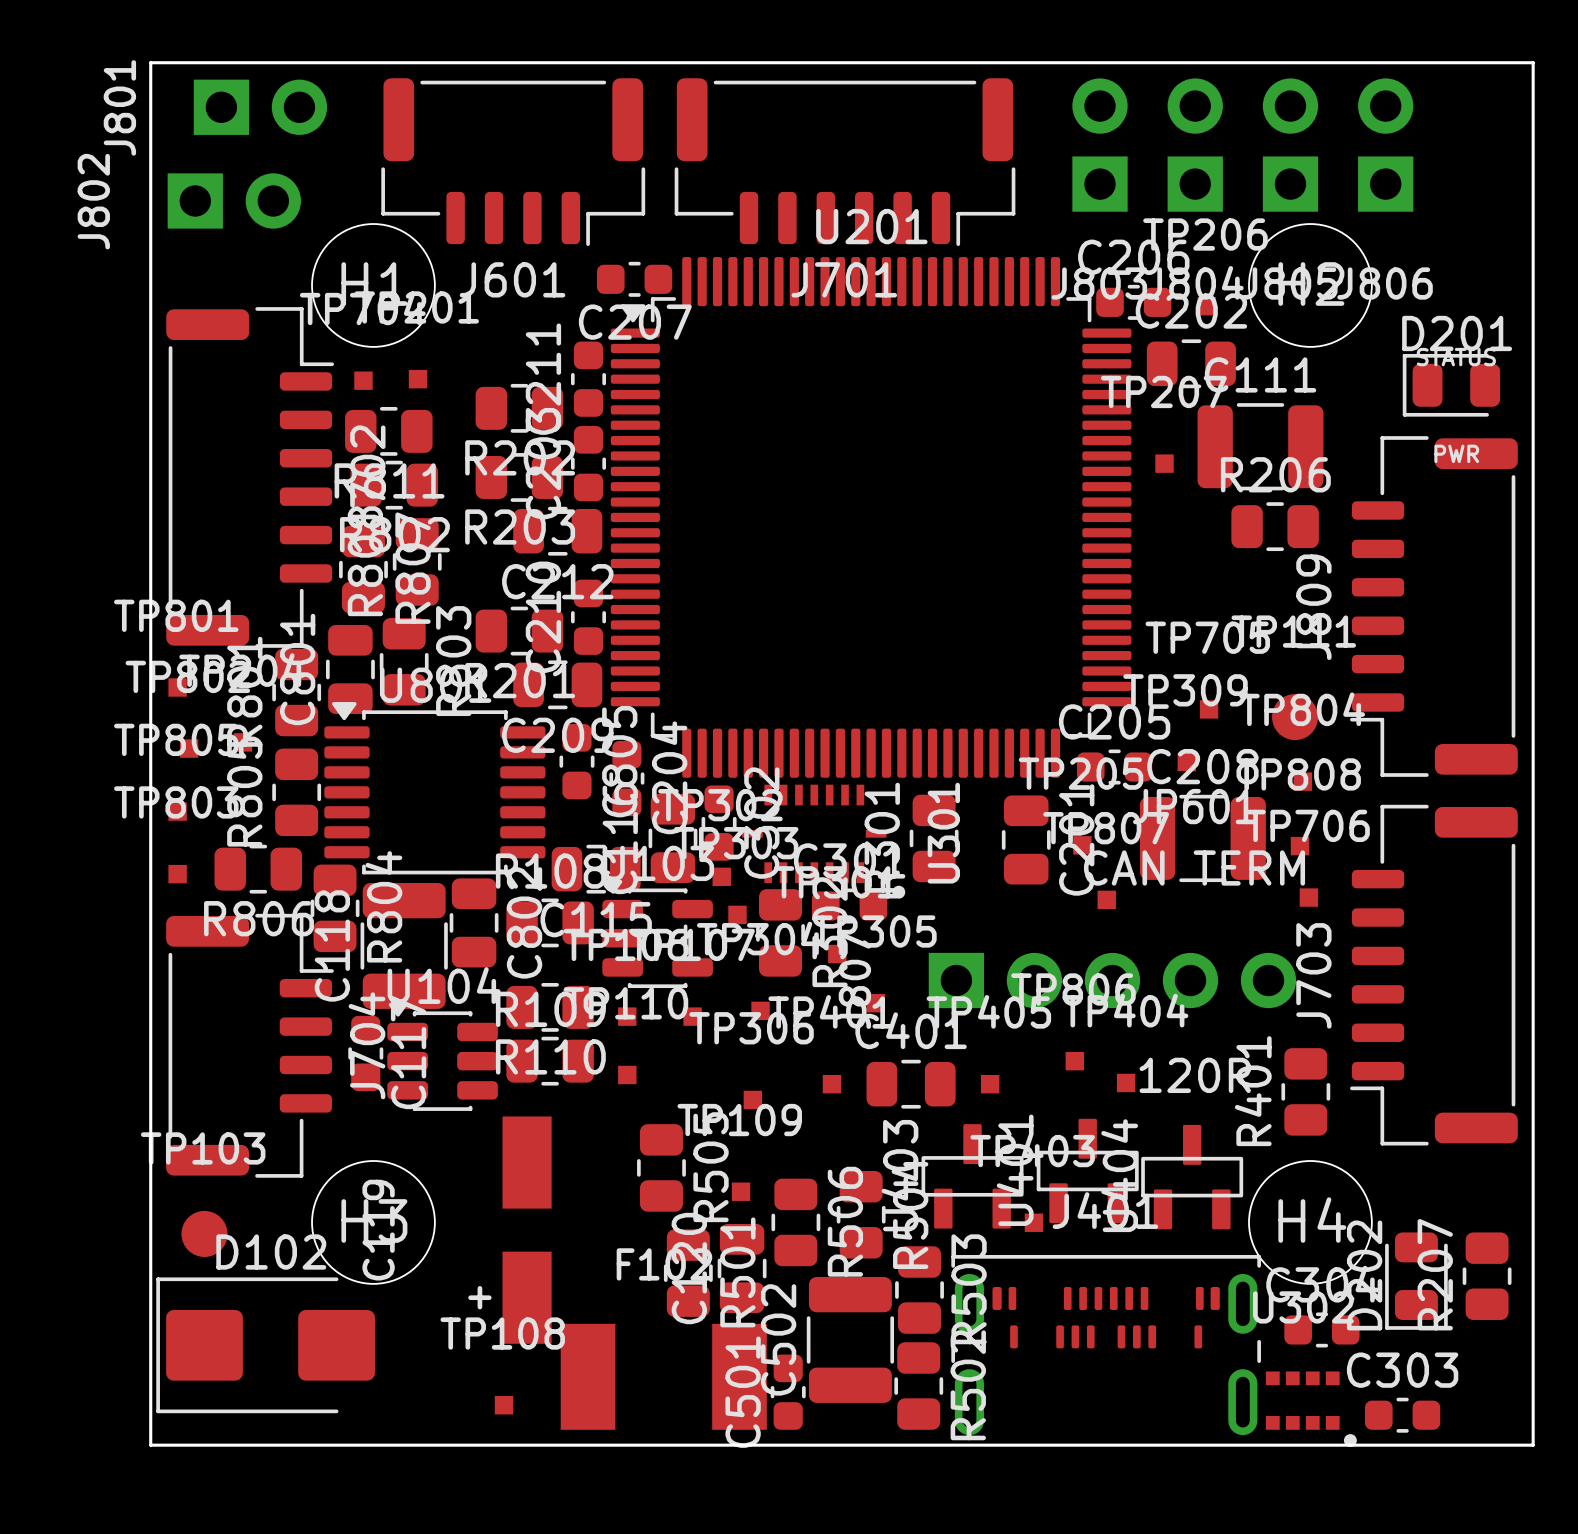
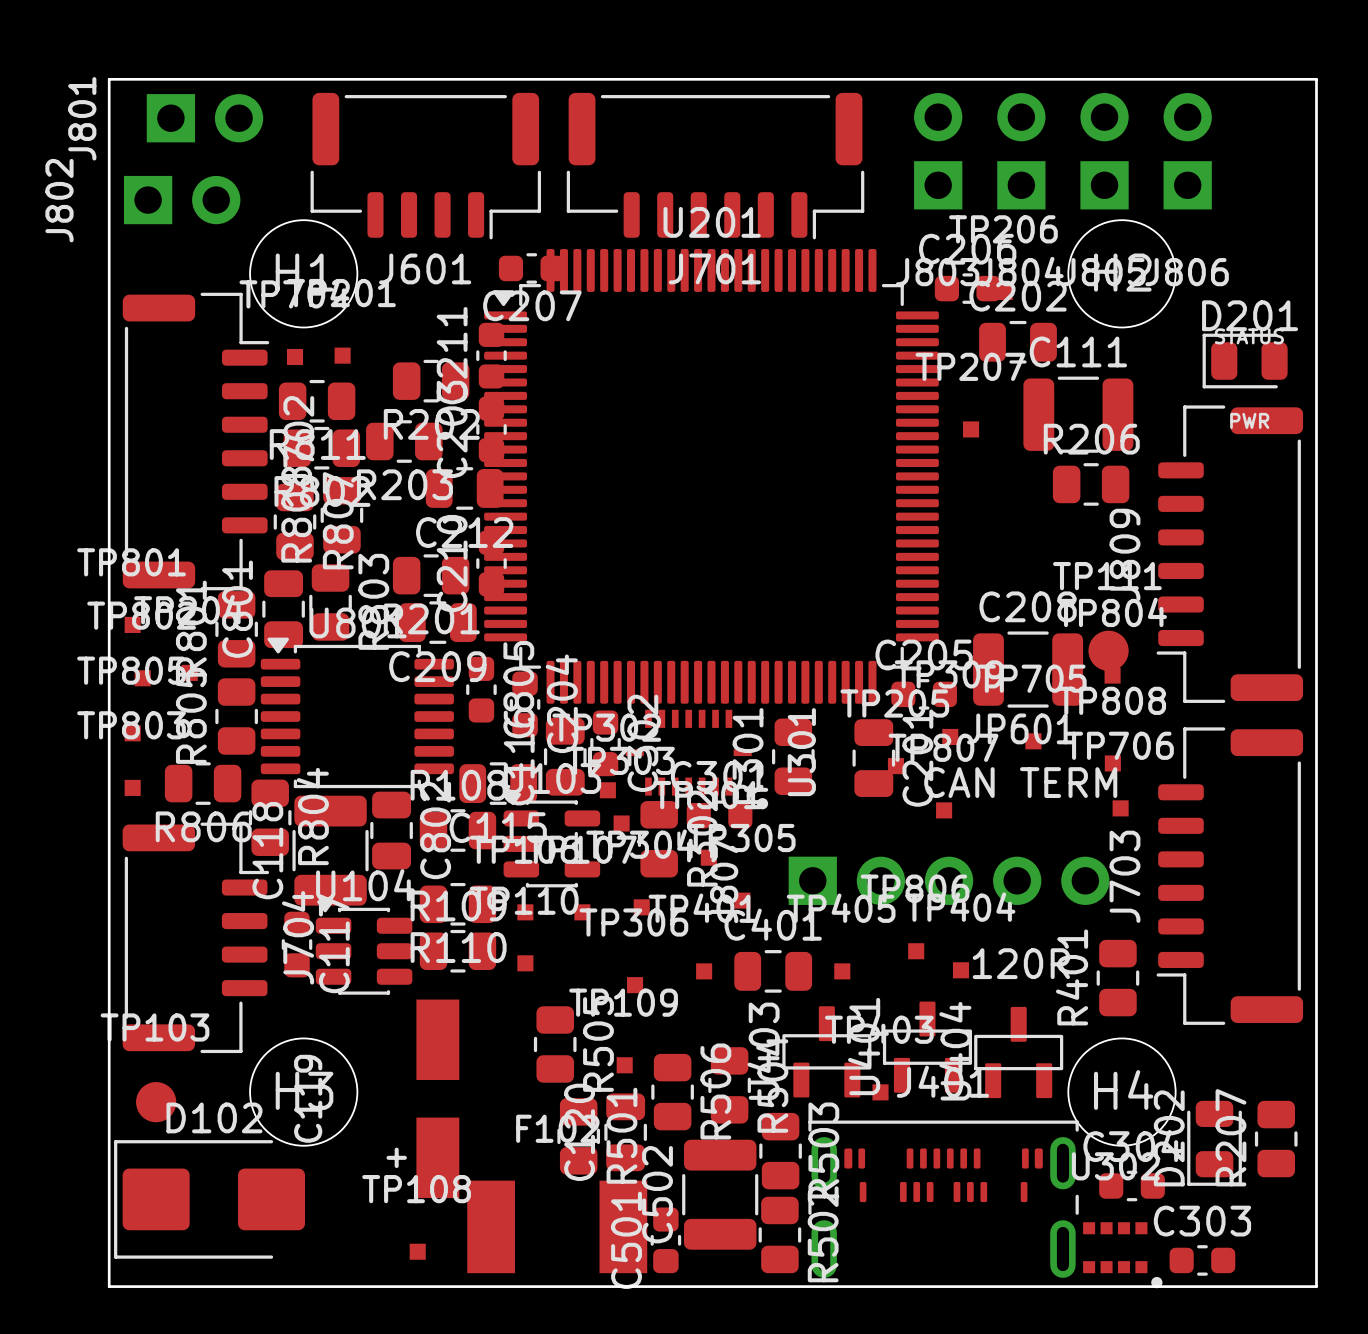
TP206 position: (1206, 306) -> (1004, 291)
TP207 position: (1164, 463) -> (971, 429)
R203 position: (519, 477) -> (404, 441)
U201 position: (871, 517) -> (711, 476)
C209 position: (557, 684) -> (437, 622)
TP705 position: (1209, 709) -> (1033, 741)
TP309 position: (1186, 762) -> (950, 736)
C205 position: (1114, 767) -> (924, 694)
TP804 position: (1302, 781) -> (1112, 675)
C208 position: (1202, 838) -> (1028, 669)
TP205 position: (1082, 845) -> (895, 766)

